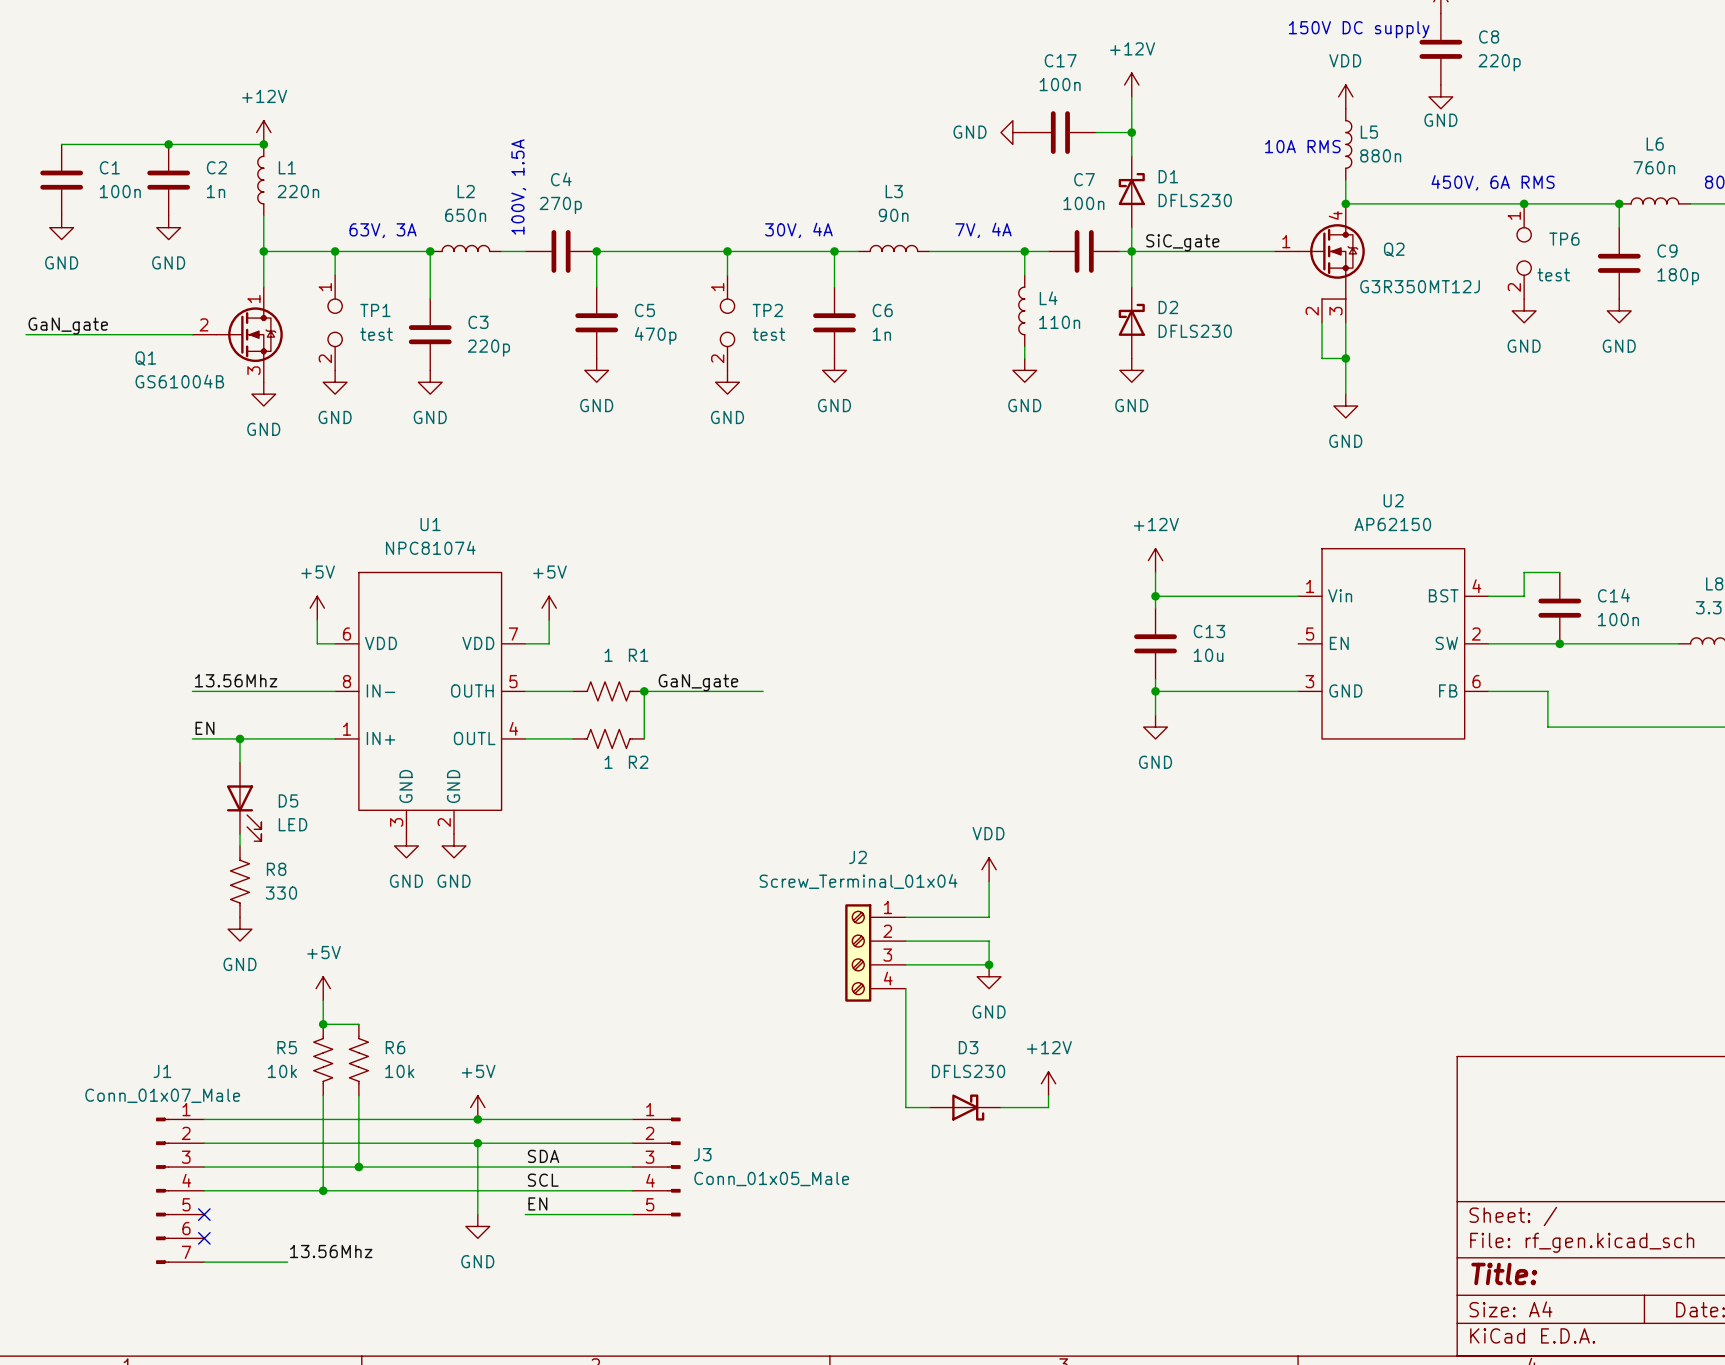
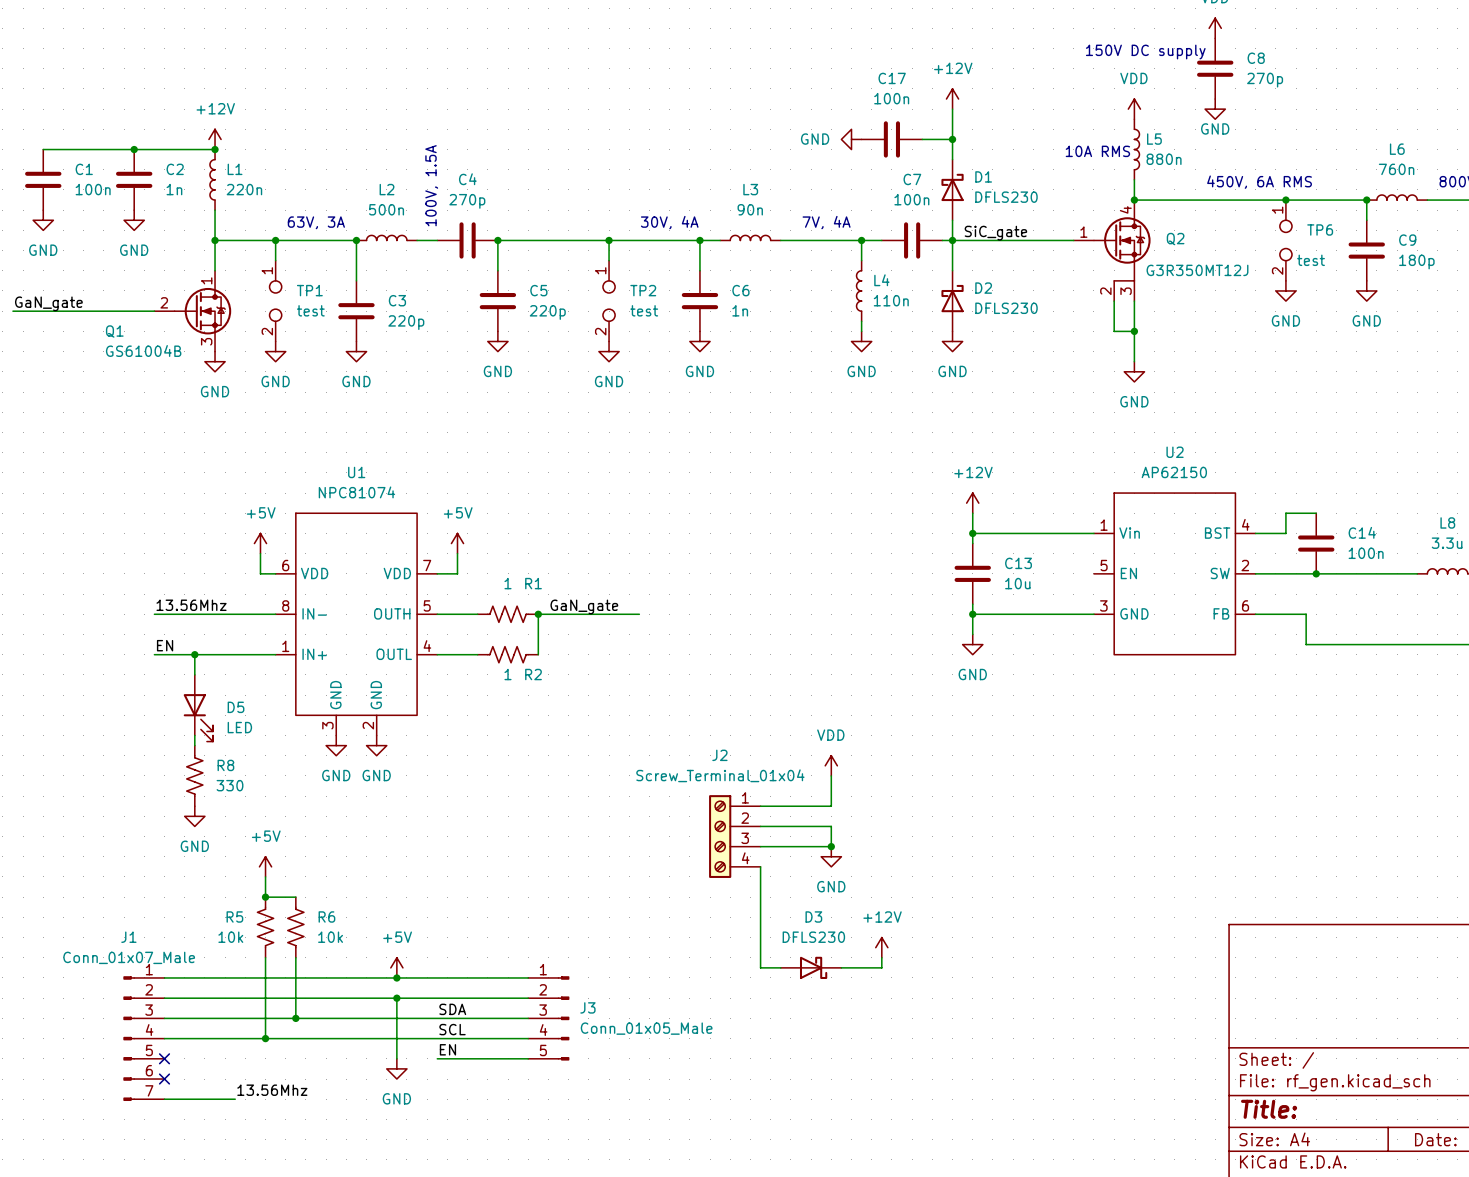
C8 value: 220p (1499, 62) -> 270p (1265, 80)
L2 value: 650n (465, 215) -> 500n (386, 209)
C5 value: 470p (655, 335) -> 220p (547, 312)

